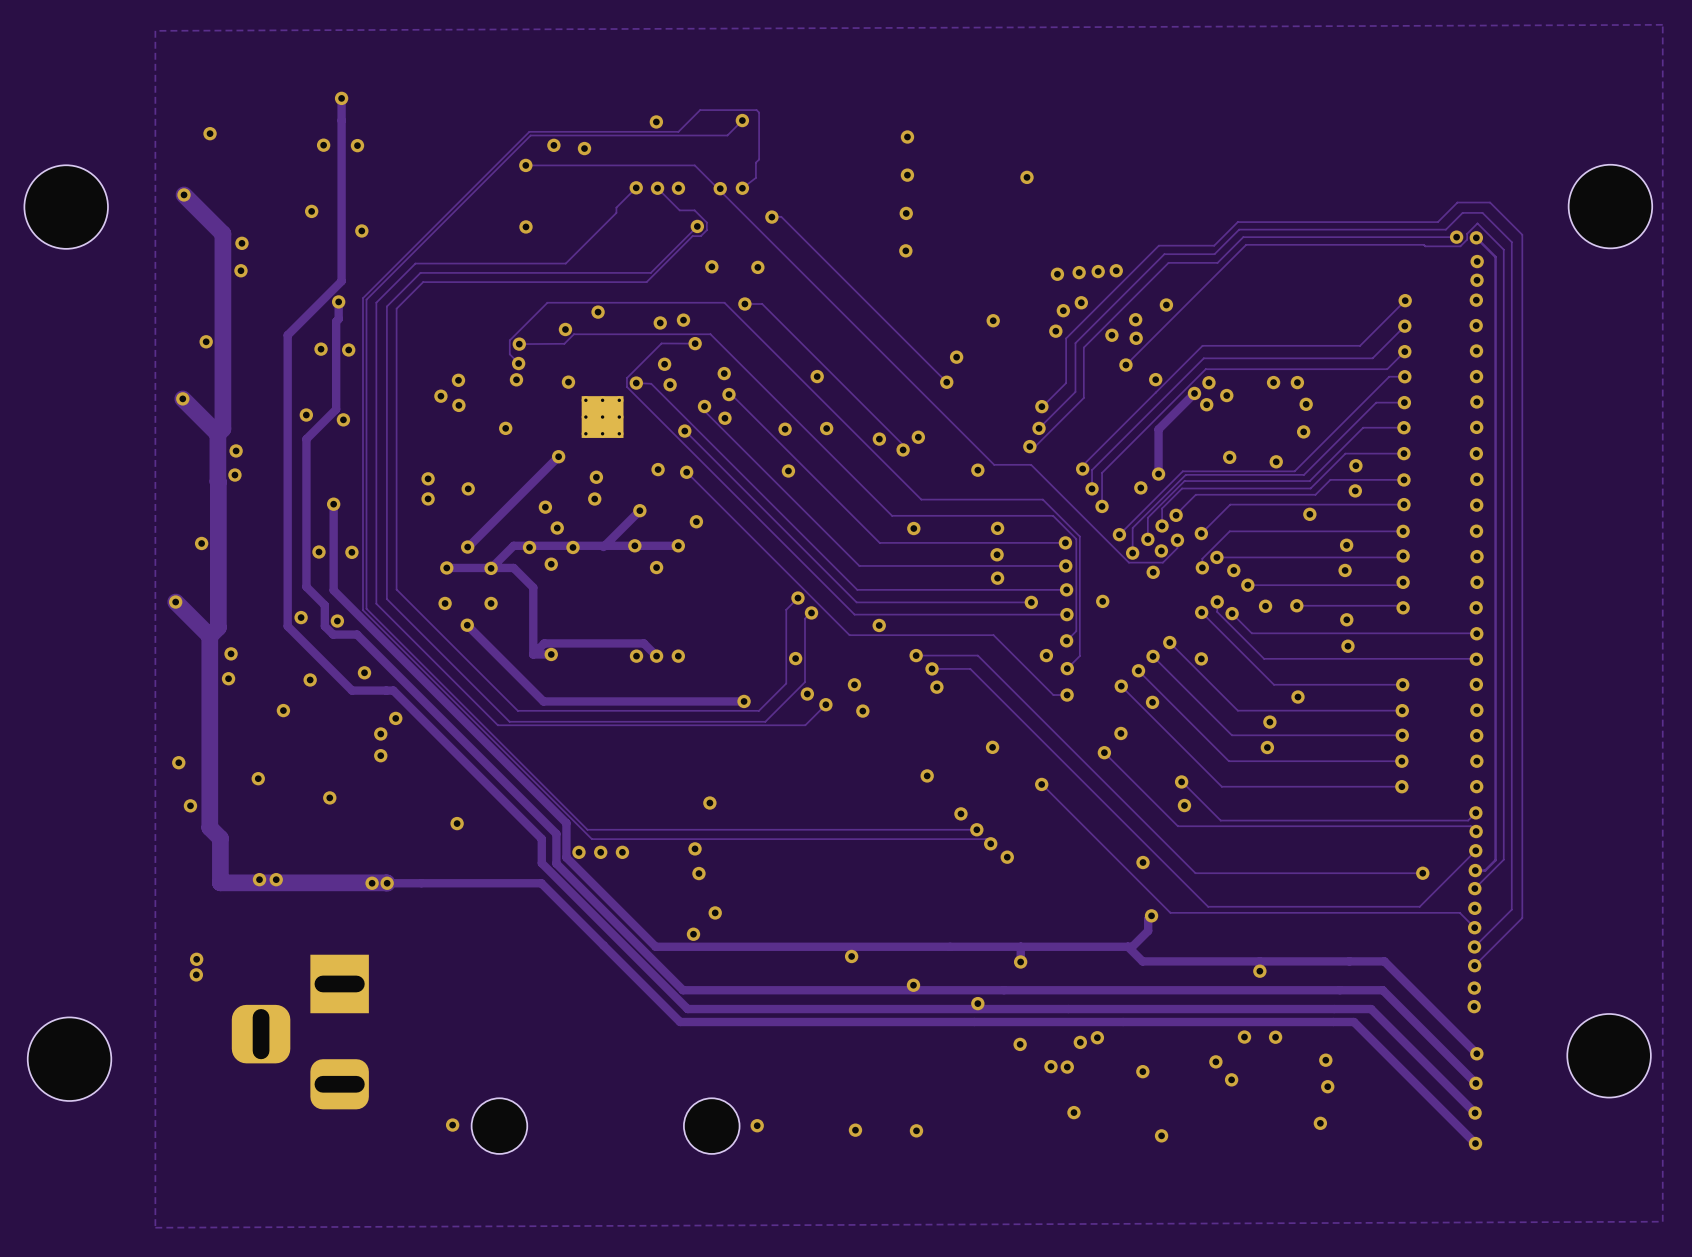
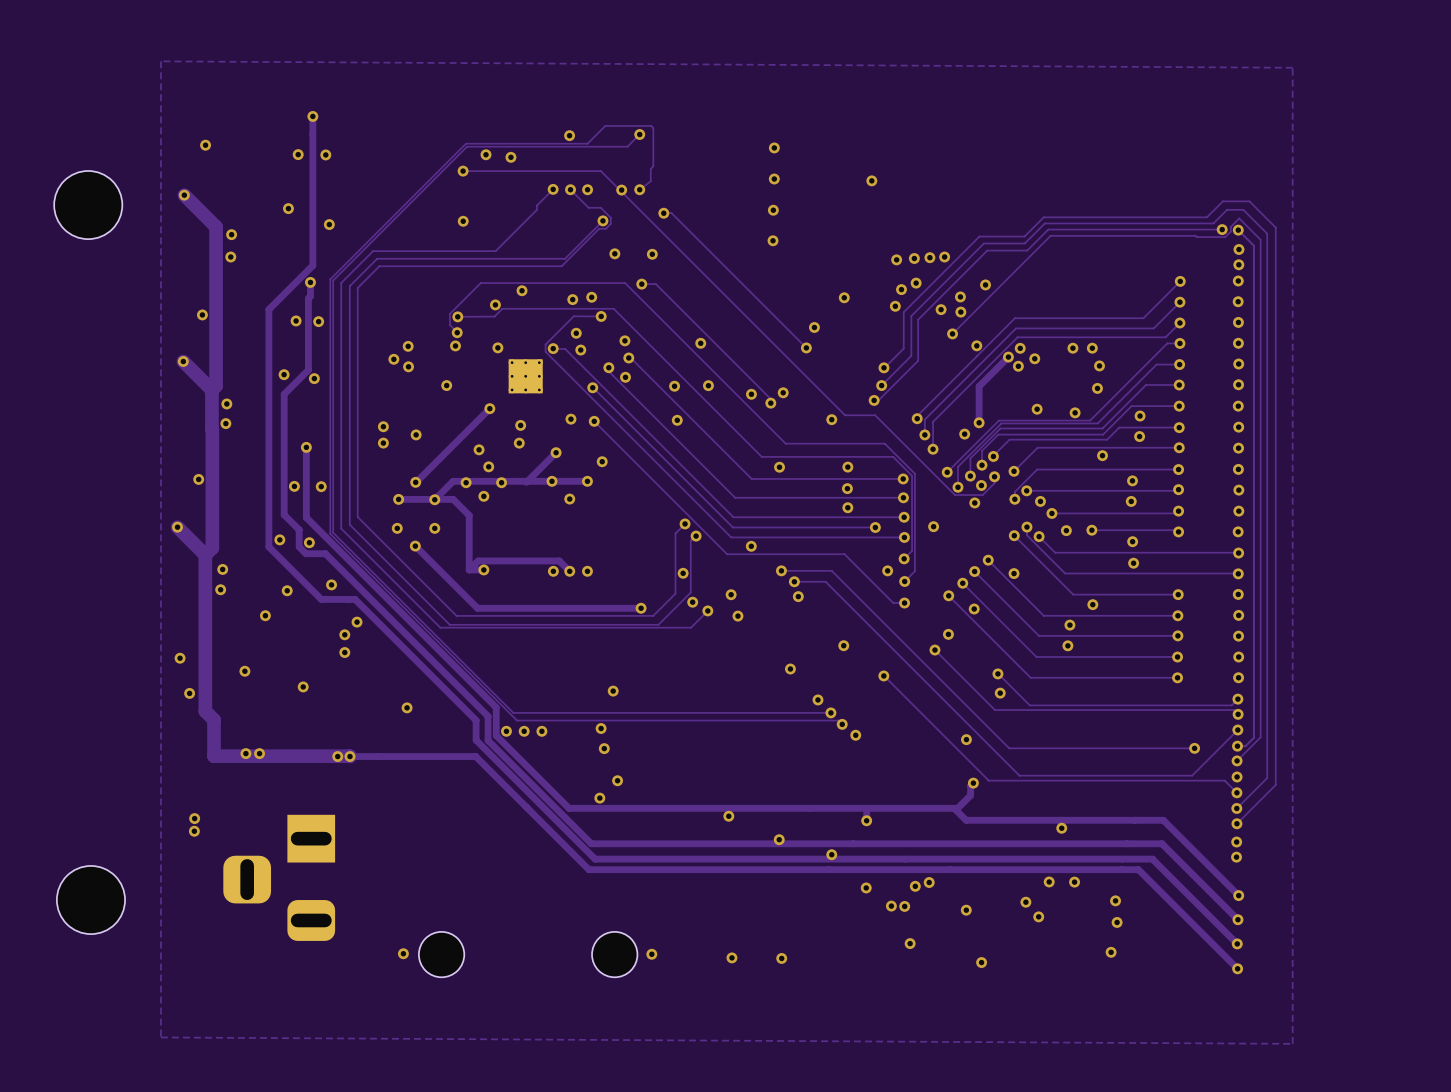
zone outline: (155, 30) (1662, 24) (1662, 1221) (155, 1227) -> (160, 61) (1292, 67) (1292, 1043) (160, 1037)
part: (1610, 206) -> none
part: (1609, 1055) -> none

